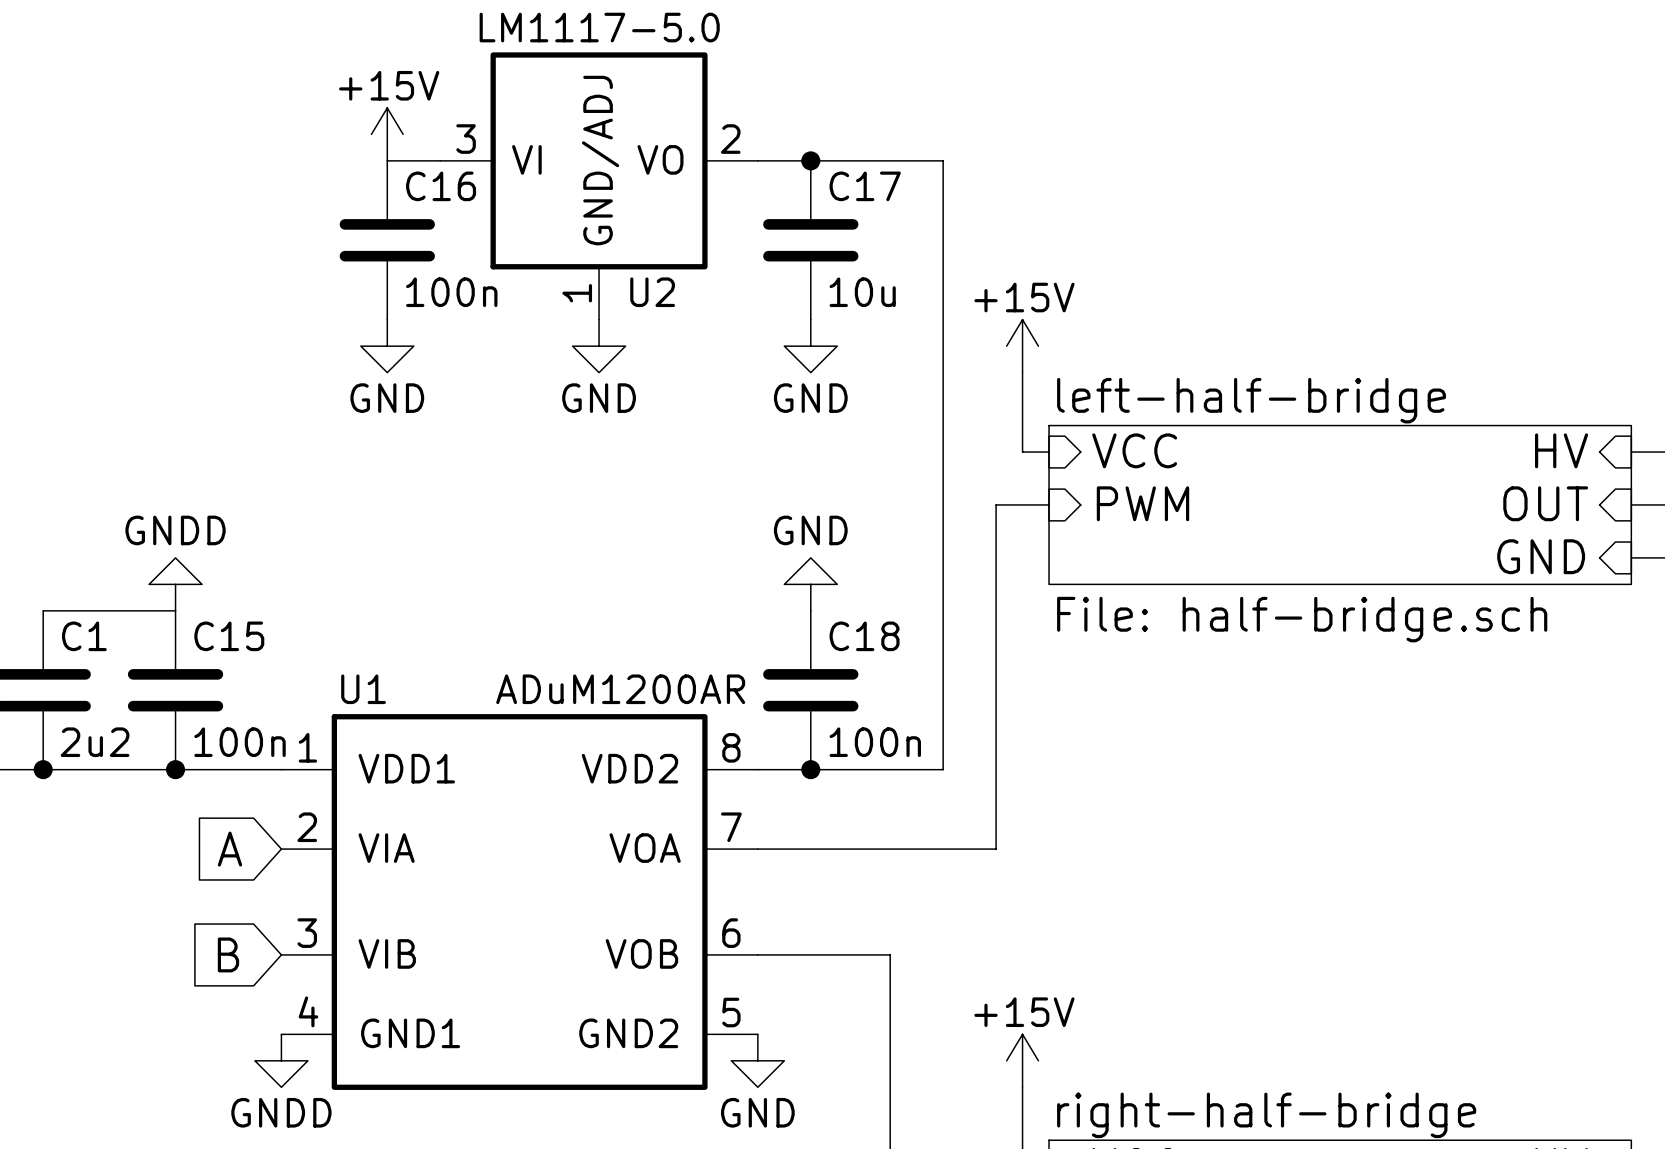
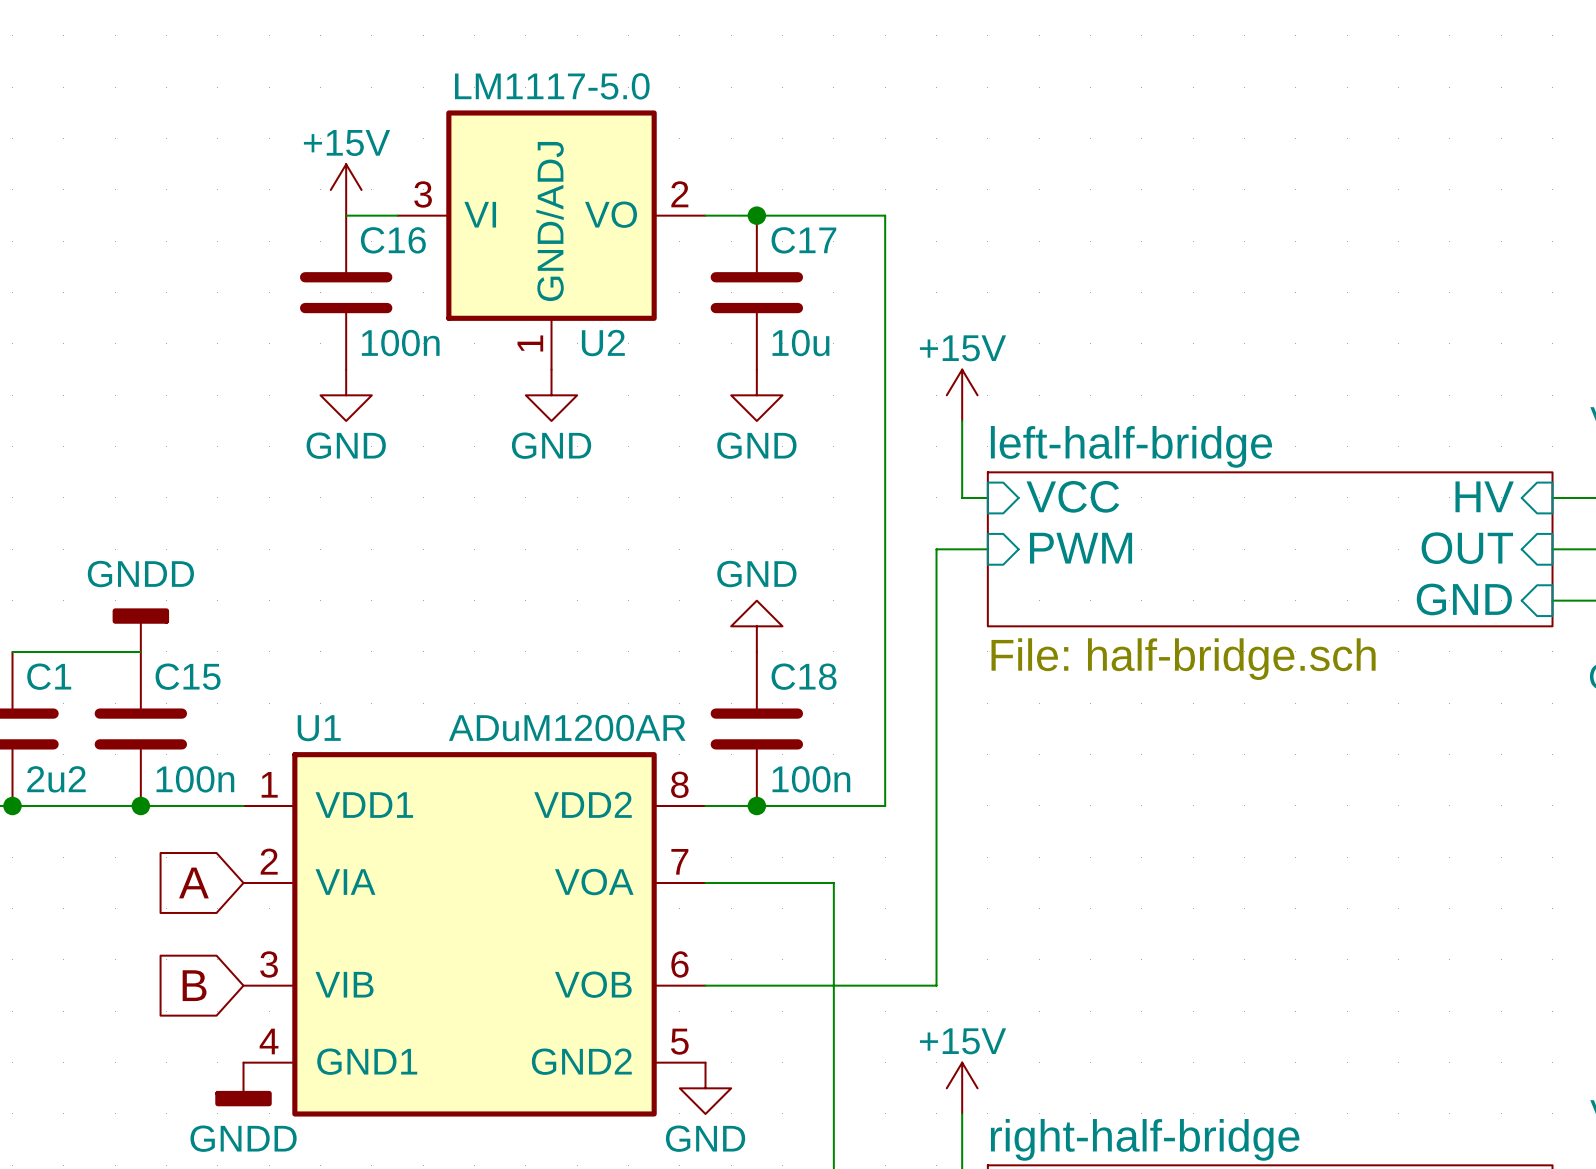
power symbol shape: [149, 557, 203, 611] -> [112, 608, 170, 652]
wire: (890, 849) (996, 849) -> (833, 882) (833, 985) (936, 985) (936, 882)
power symbol shape: [254, 1034, 308, 1088] -> [215, 1062, 272, 1107]

